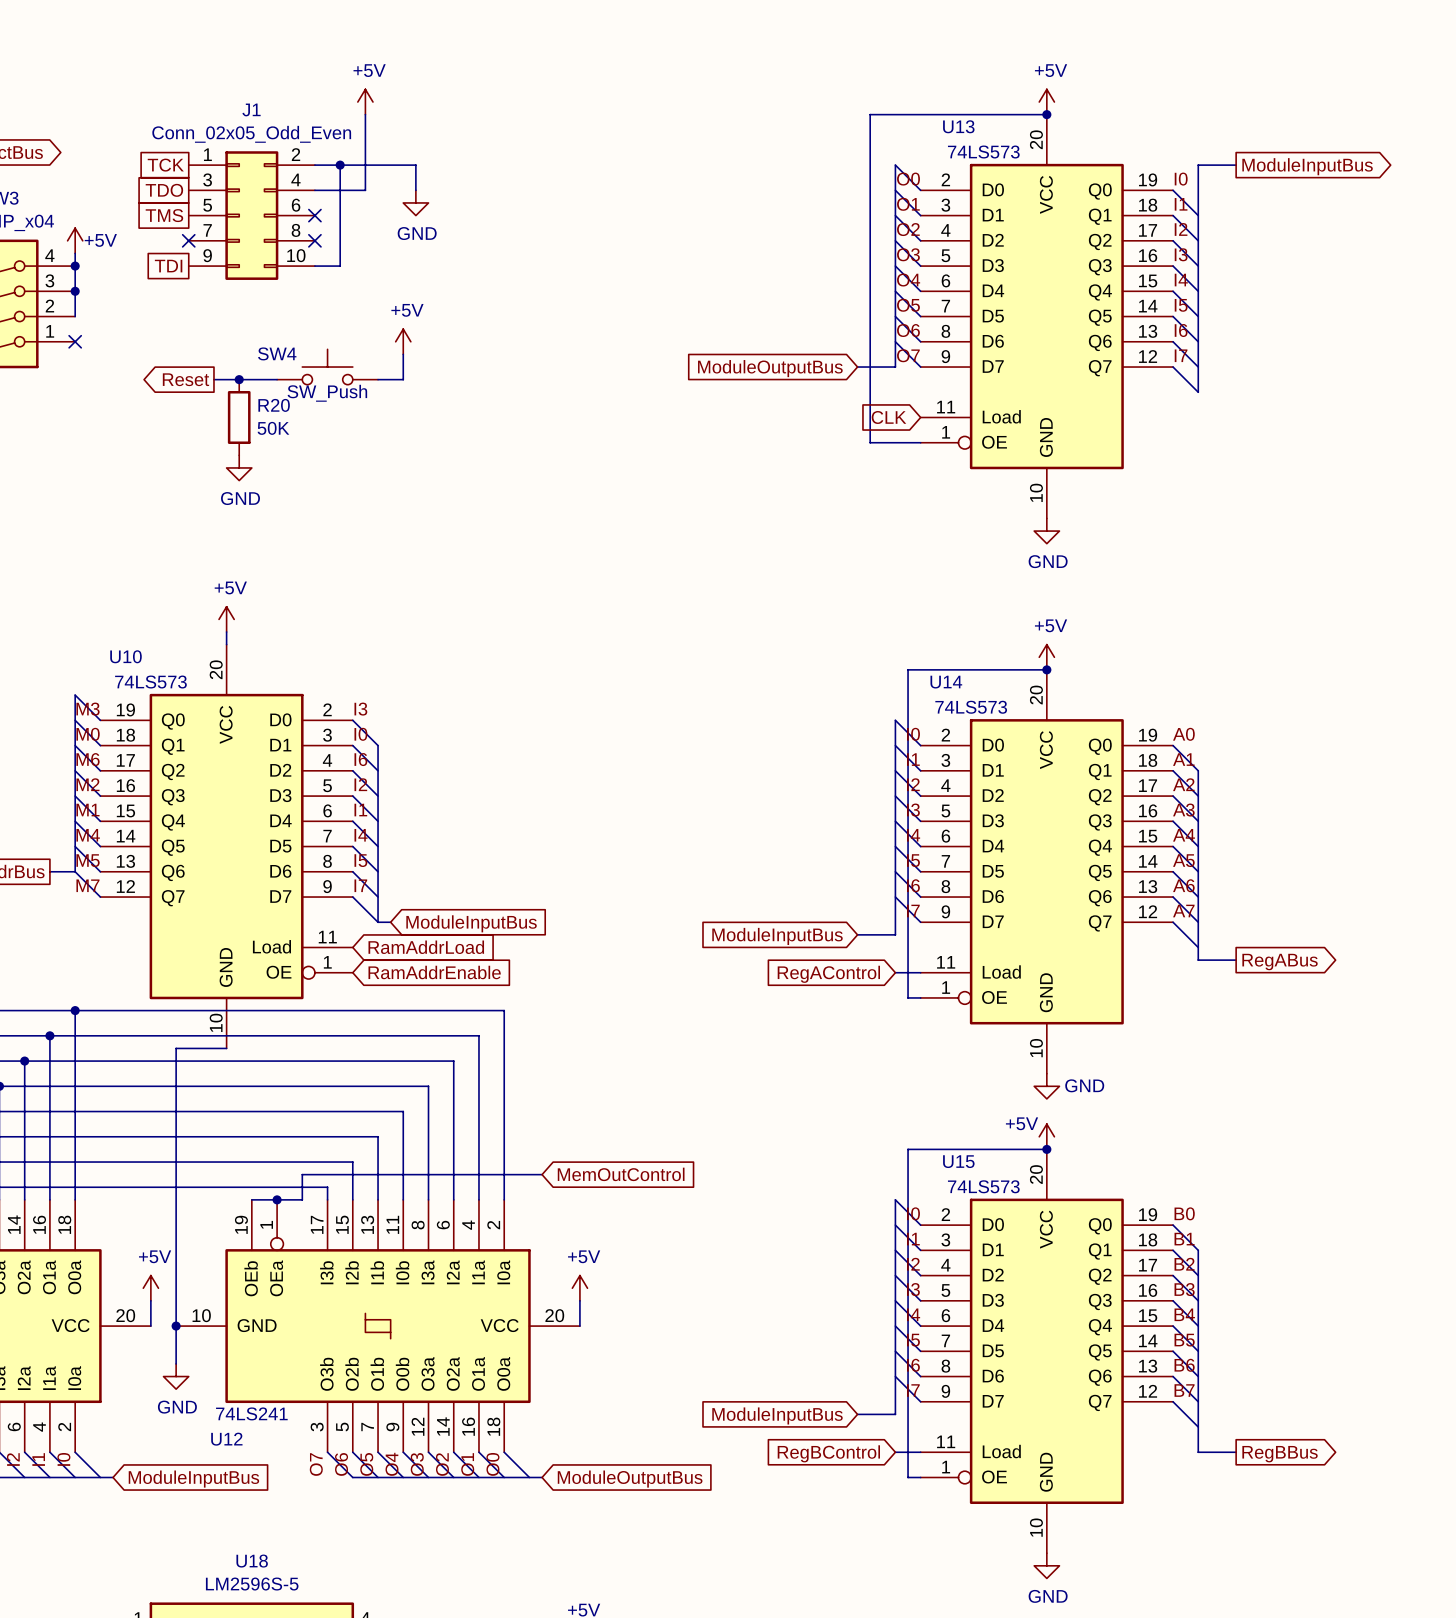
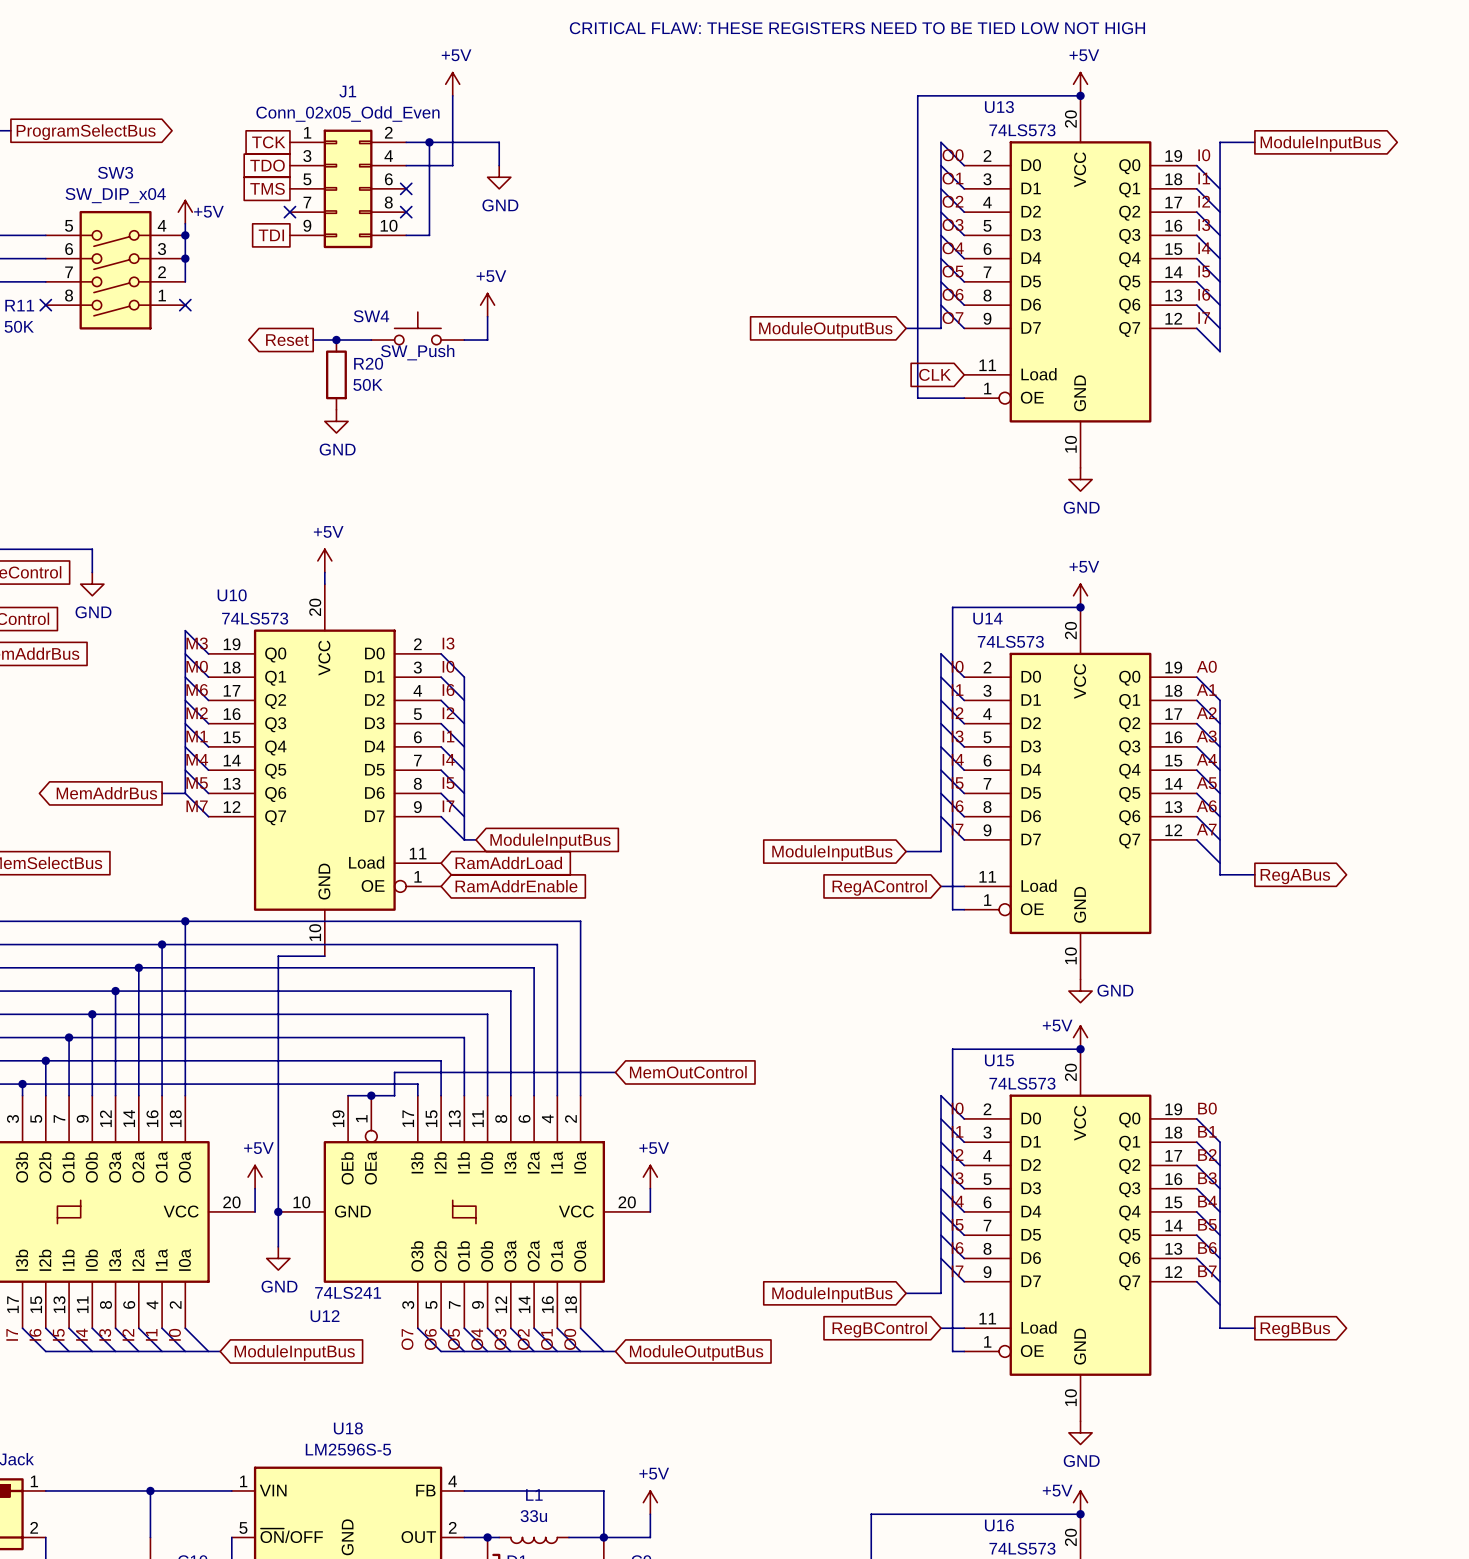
text: none -> CRITICAL FLAW: THESE REGISTERS NEED TO BE TIED LOW NOT HIGH (857, 28)

